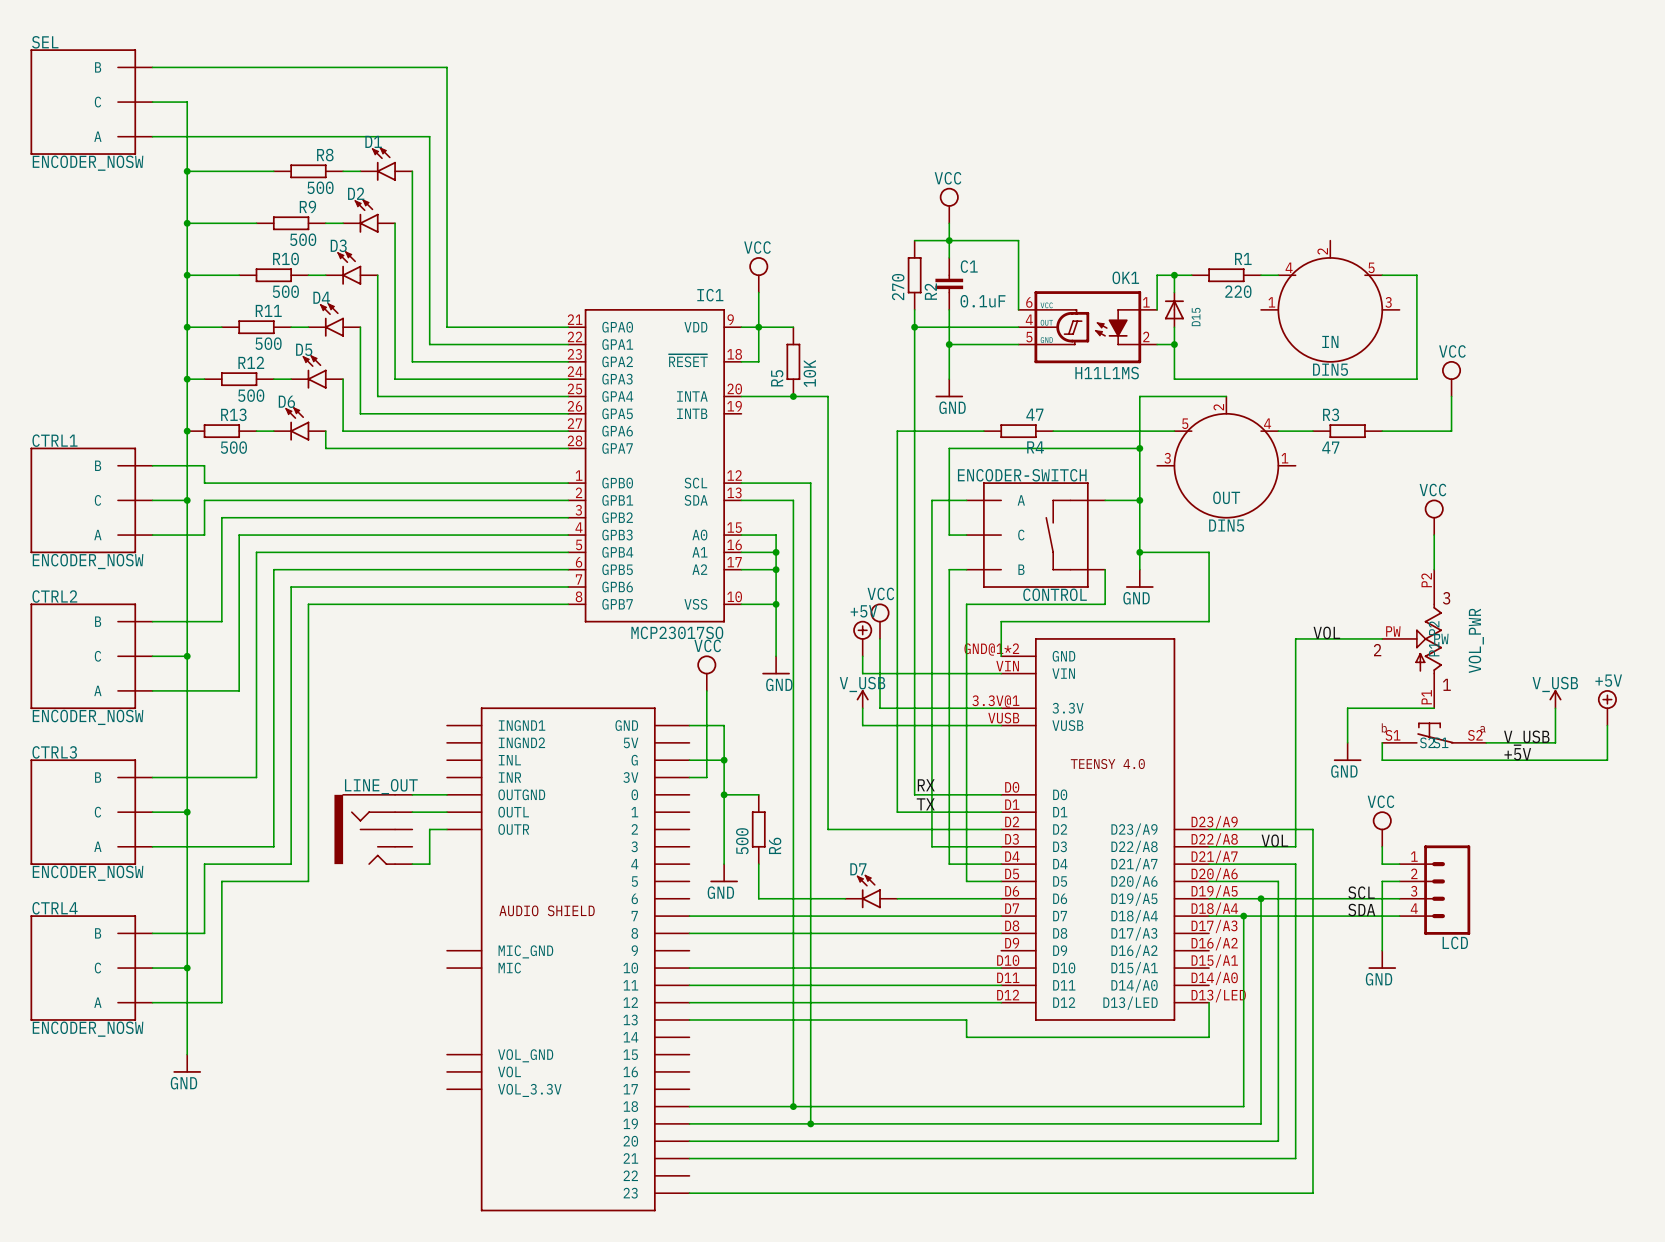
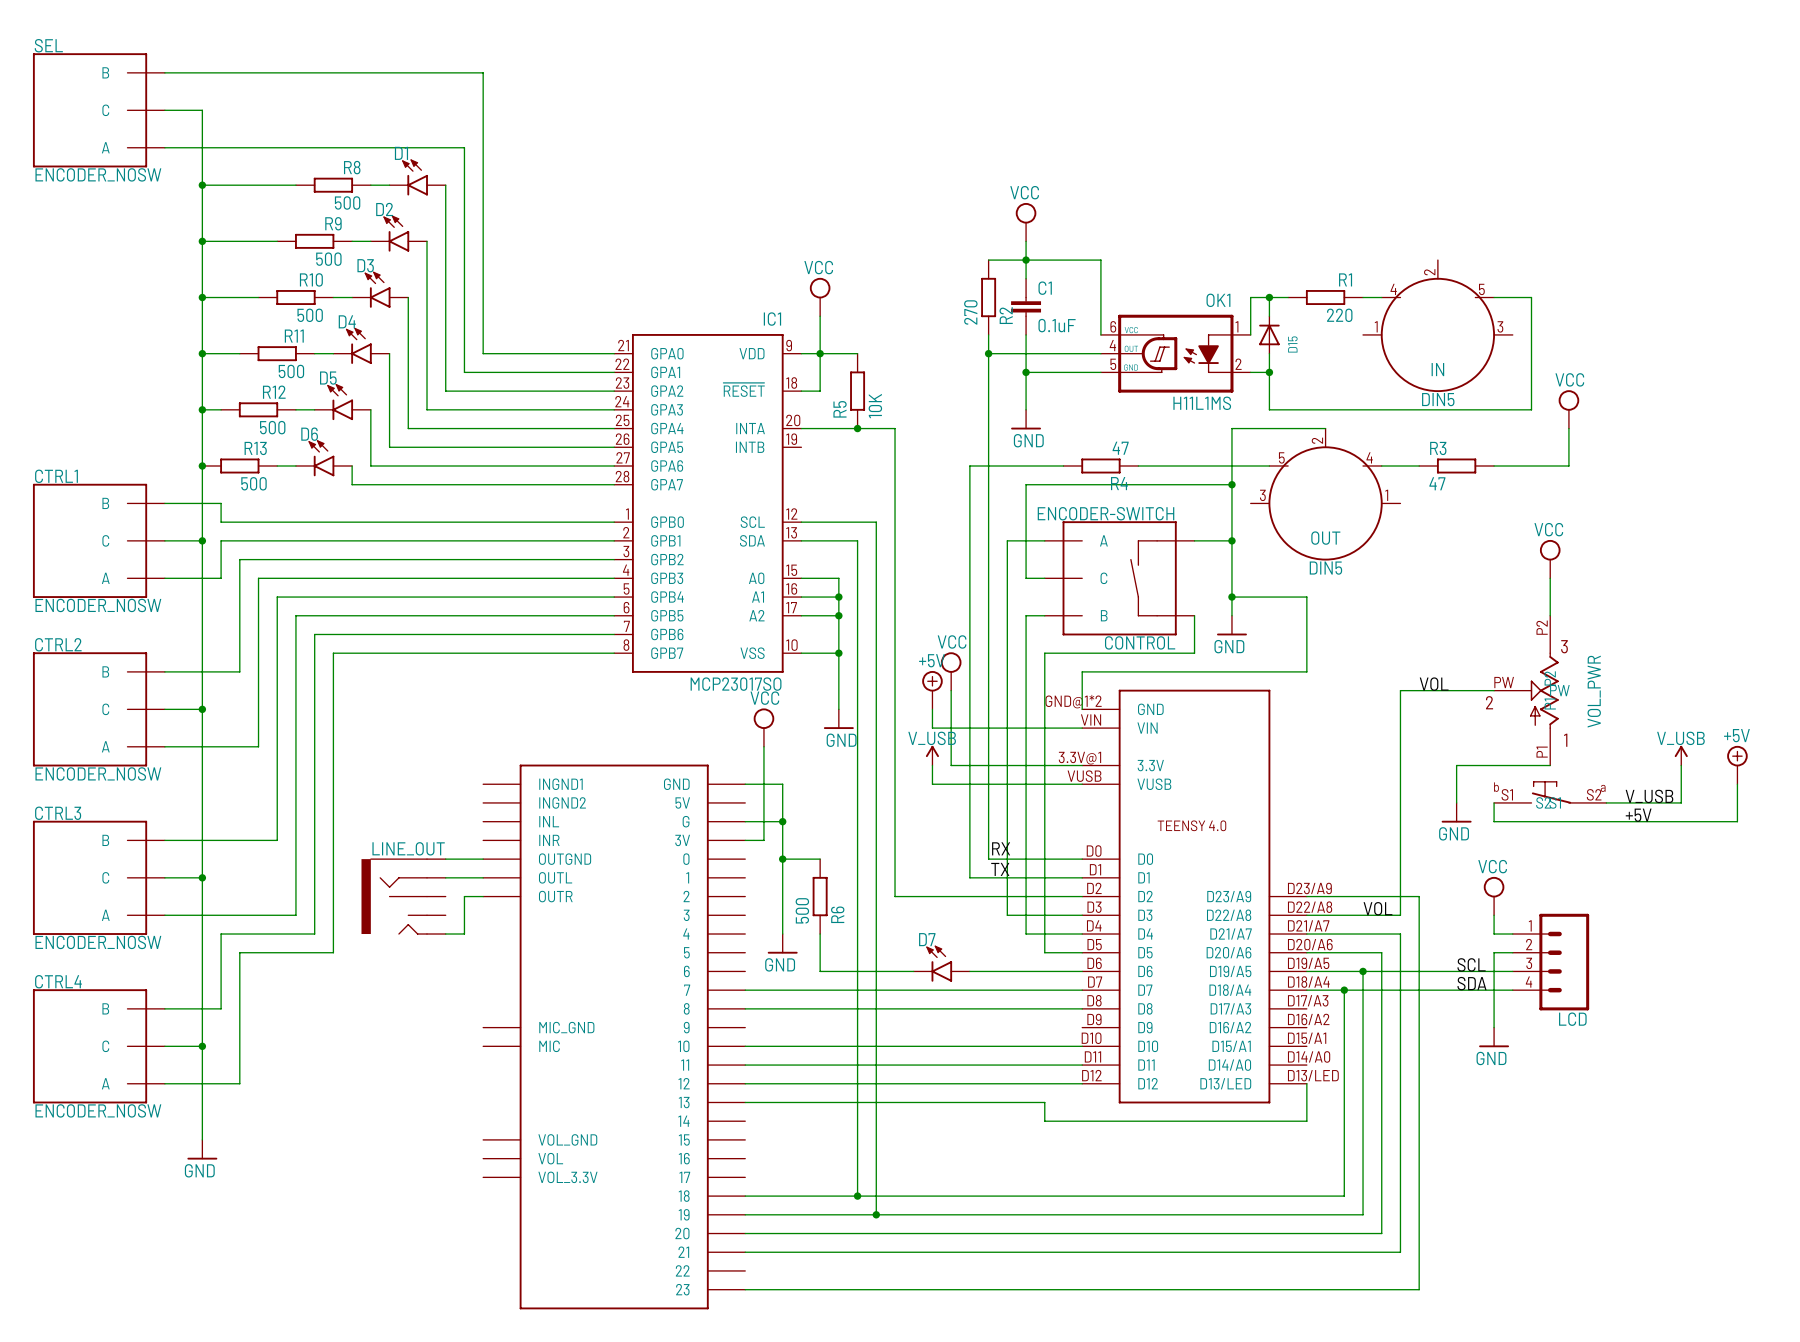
text: AUDIO SHIELD (547, 910) -> none

